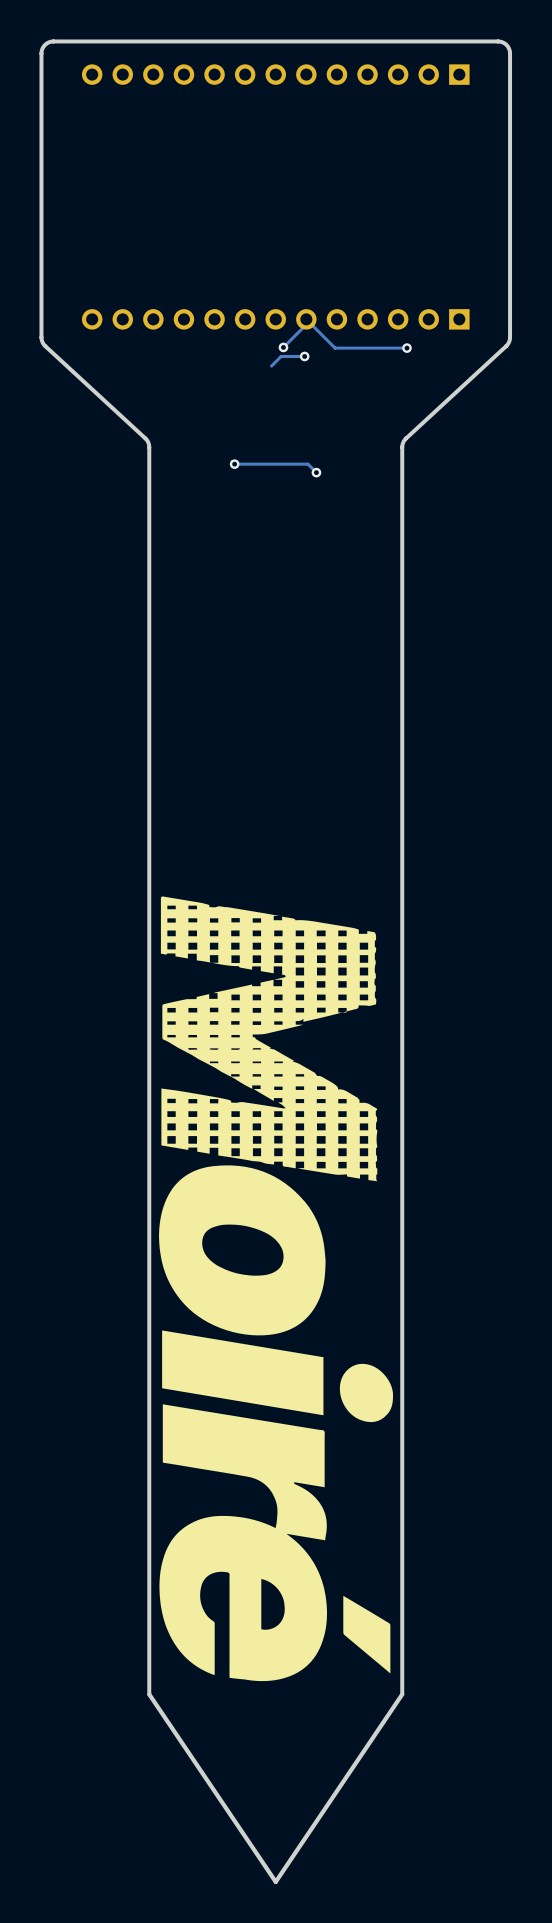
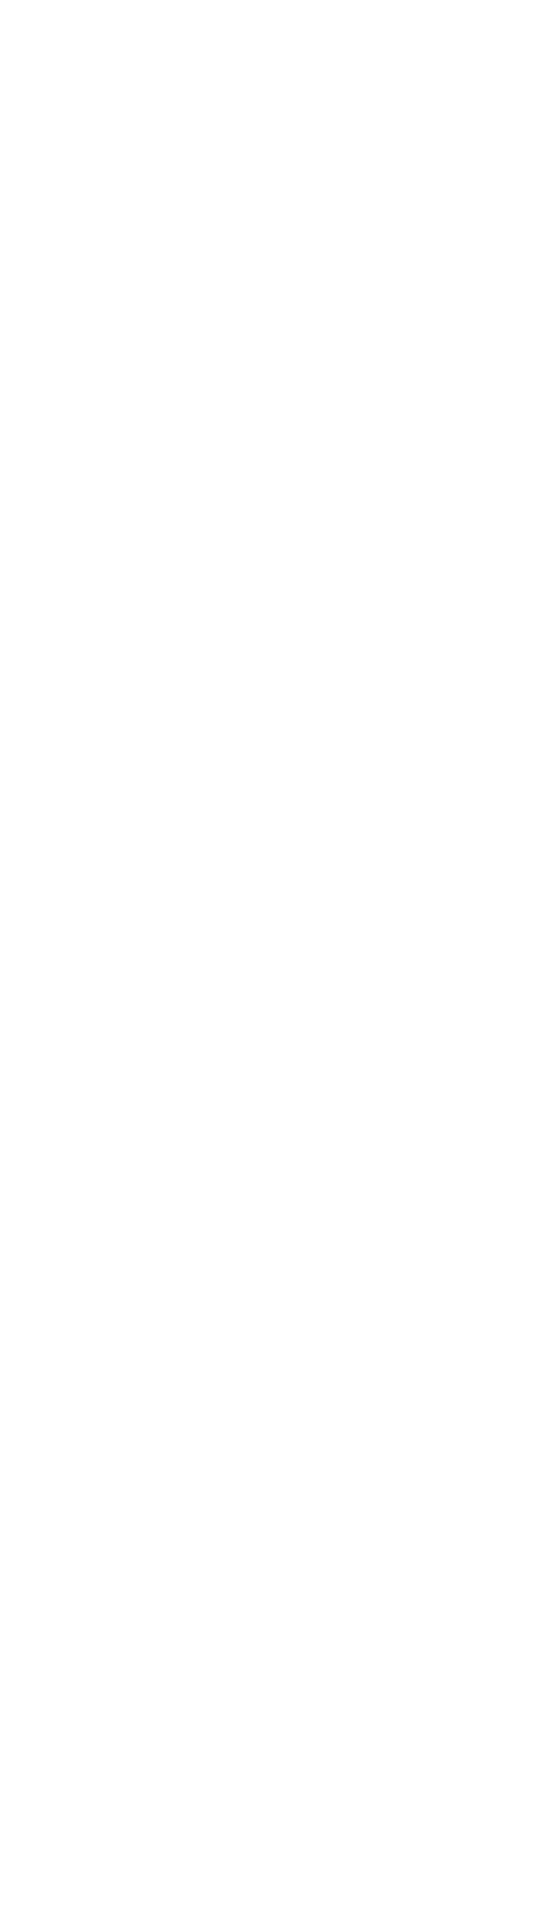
board edge: (498, 41) (53, 41) (46, 44) (41, 52) (42, 341) (45, 346) (145, 438) (149, 446) (149, 1694) (275, 1881) (402, 1694) (402, 446) (406, 438) (506, 346) (509, 339) (510, 53) (506, 44) (498, 41) -> none
part: (275, 74) -> none
part: (275, 319) -> none
track: (306, 319) (335, 348) (406, 348) -> none
track: (302, 323) (305, 325) (283, 347) -> none
via: (283, 347) -> none
via: (406, 348) -> none
track: (304, 356) (281, 356) (271, 366) -> none
via: (304, 356) -> none
track: (232, 461) (234, 464) (307, 464) (316, 472) -> none
via: (234, 464) -> none
via: (316, 472) -> none
drawing: [159, 896, 394, 1682] -> none
drawing: [343, 1595, 391, 1674] -> none

